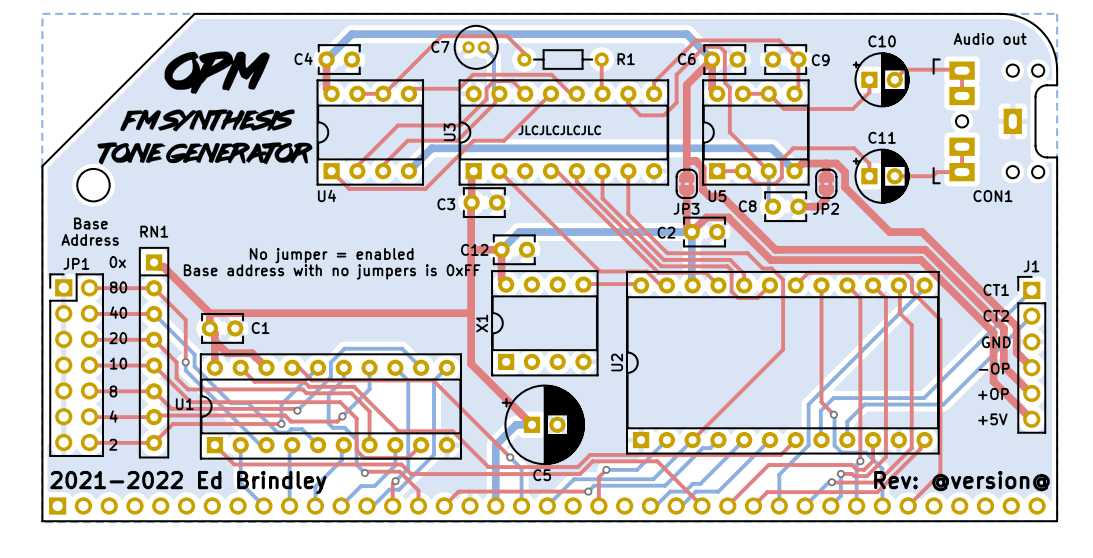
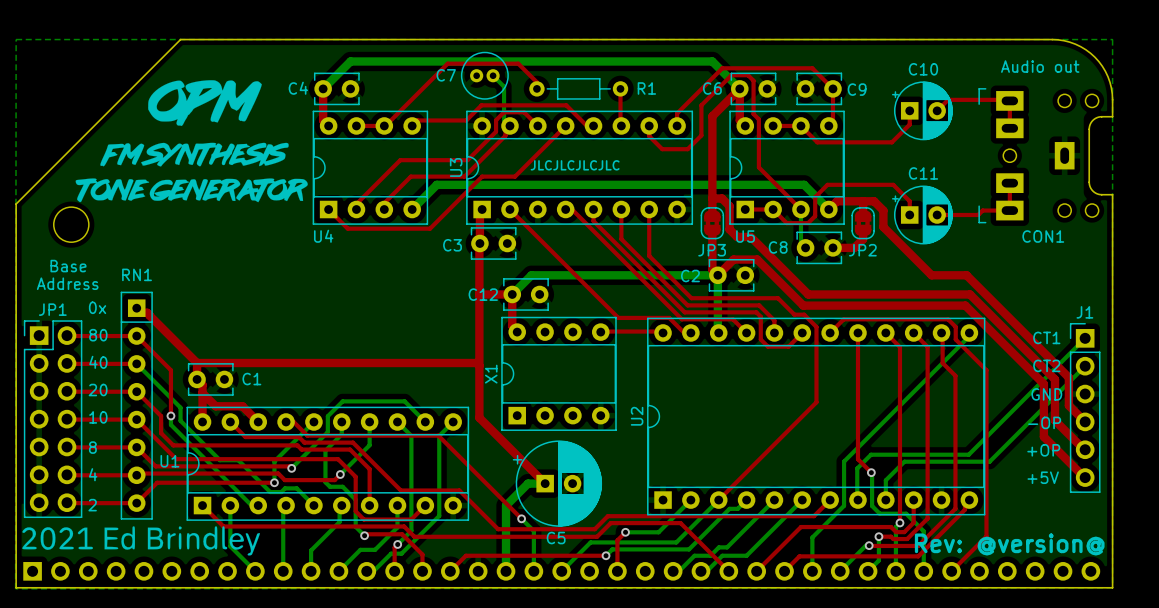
text: No jumper = enabled (331, 255) -> none
text: Base address with no jumpers is 0xFF (332, 271) -> none
drawing: none -> [22, 526, 261, 556]
text: 2021-2022 Ed Brindley (188, 482) -> none

